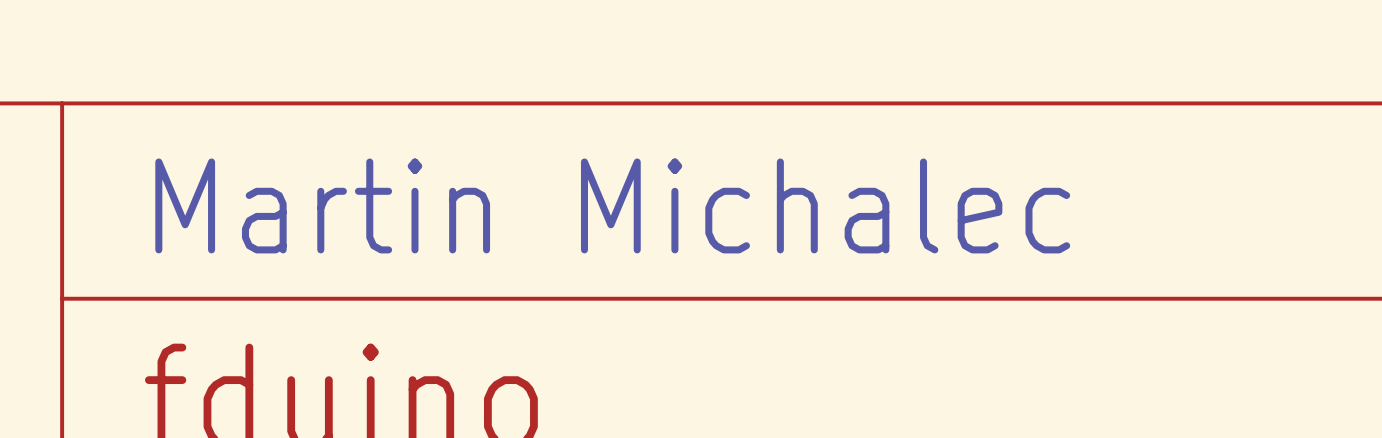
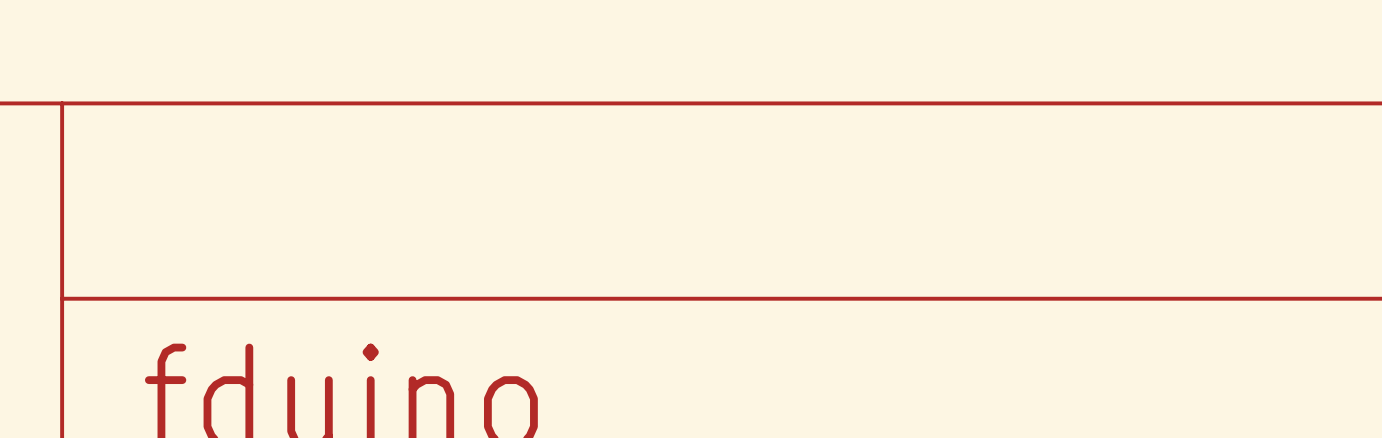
text: Martin Michalec (612, 205) -> none

